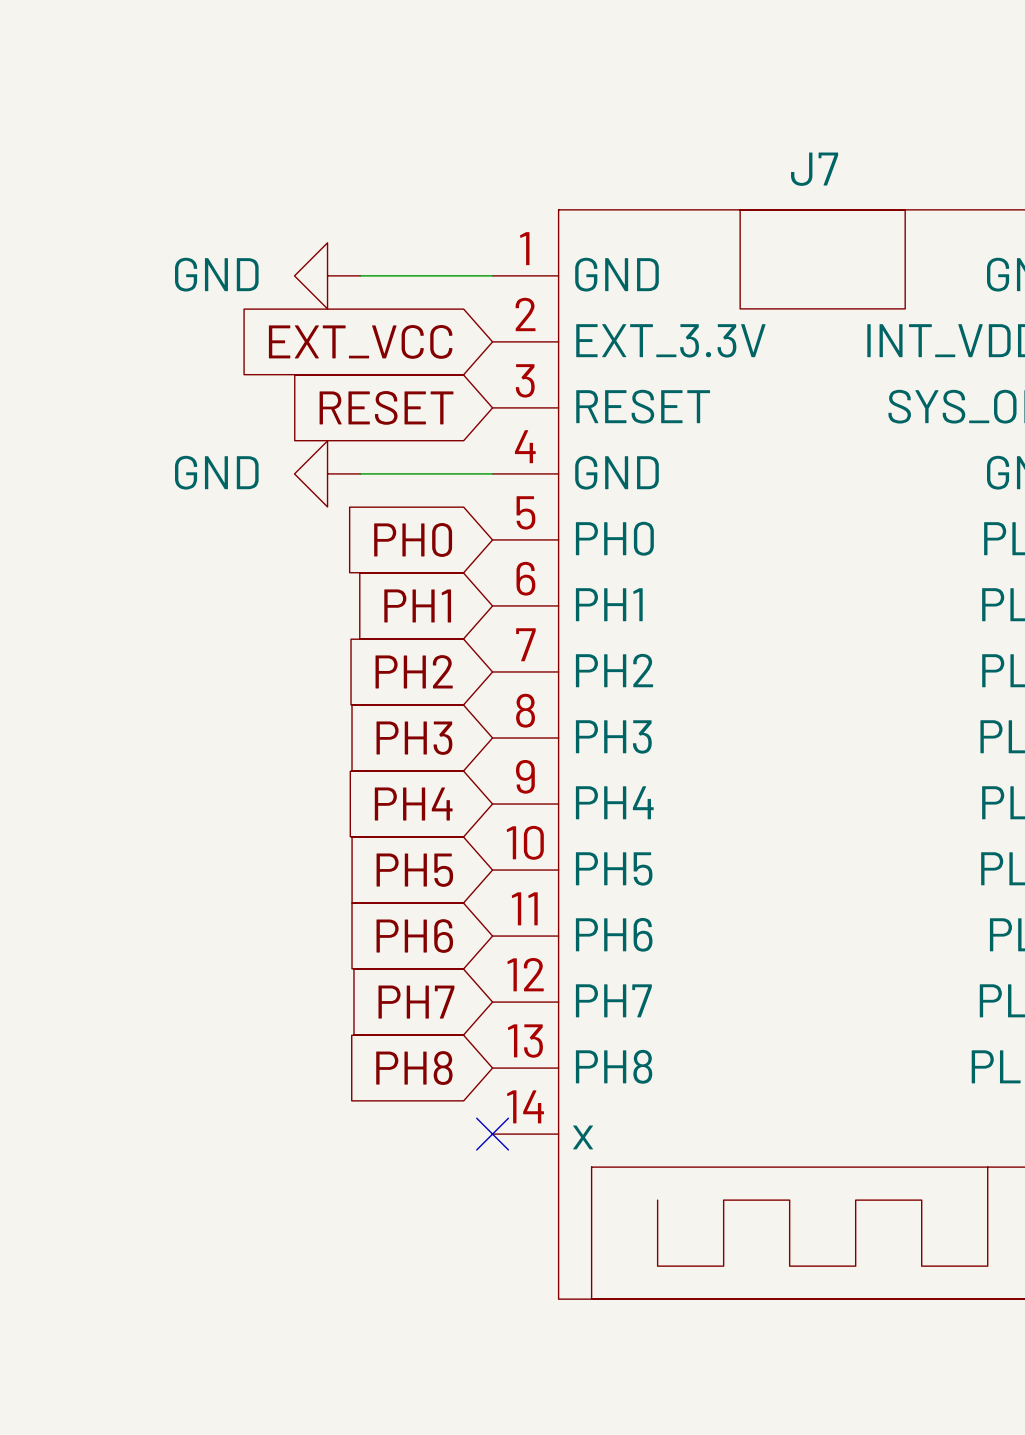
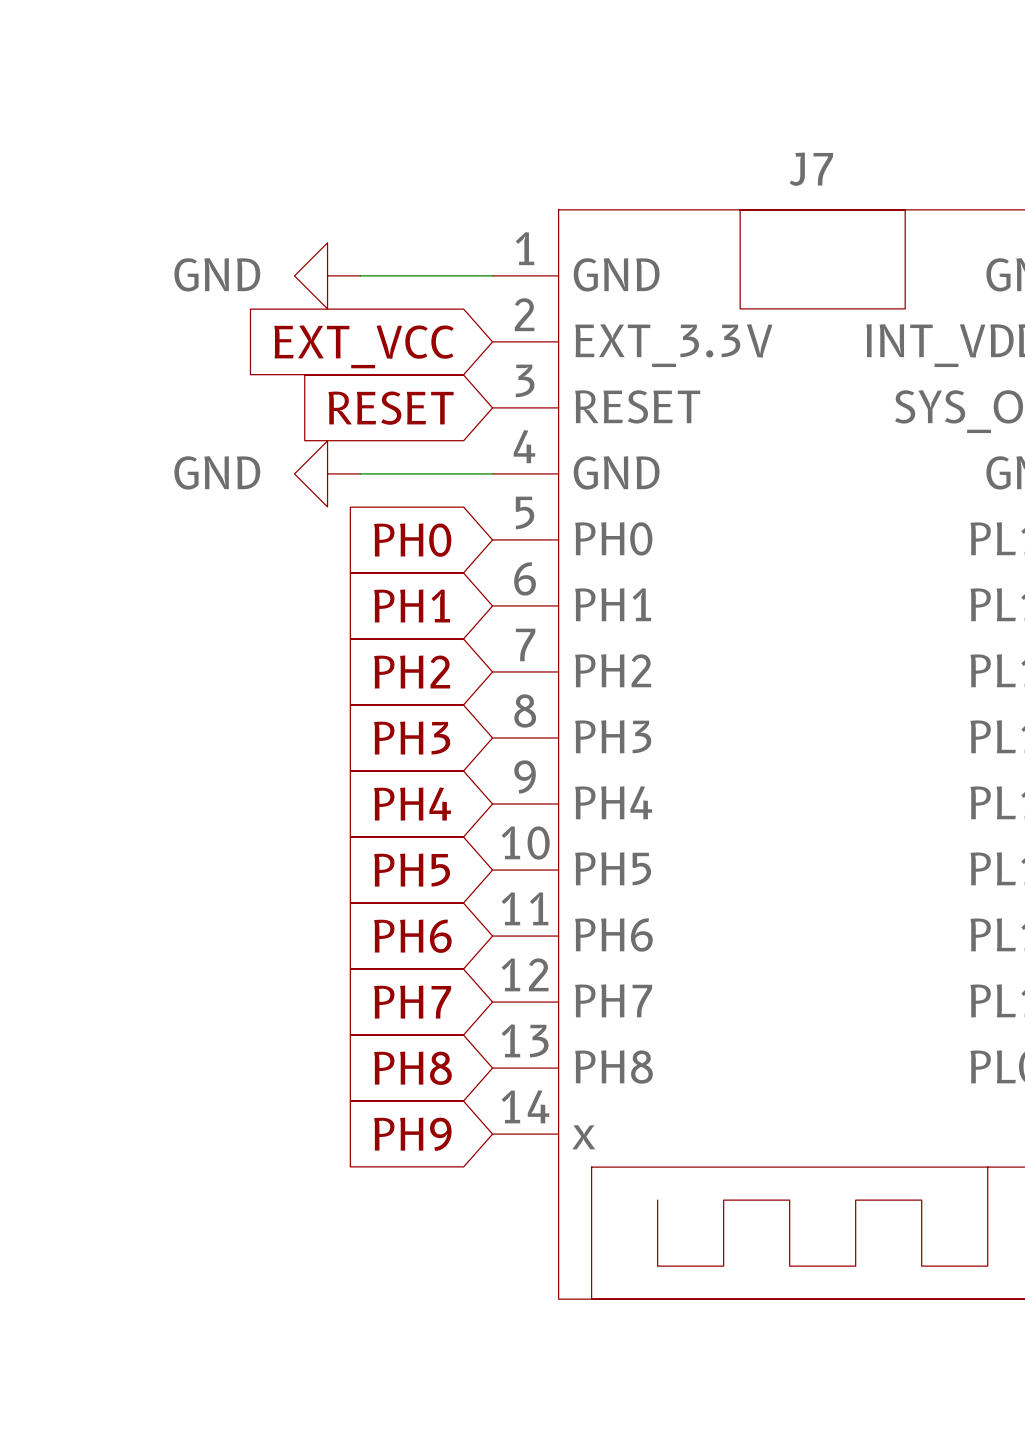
global label: none -> PH9 (412, 1134)
no-connect mark: (492, 1134) -> none

